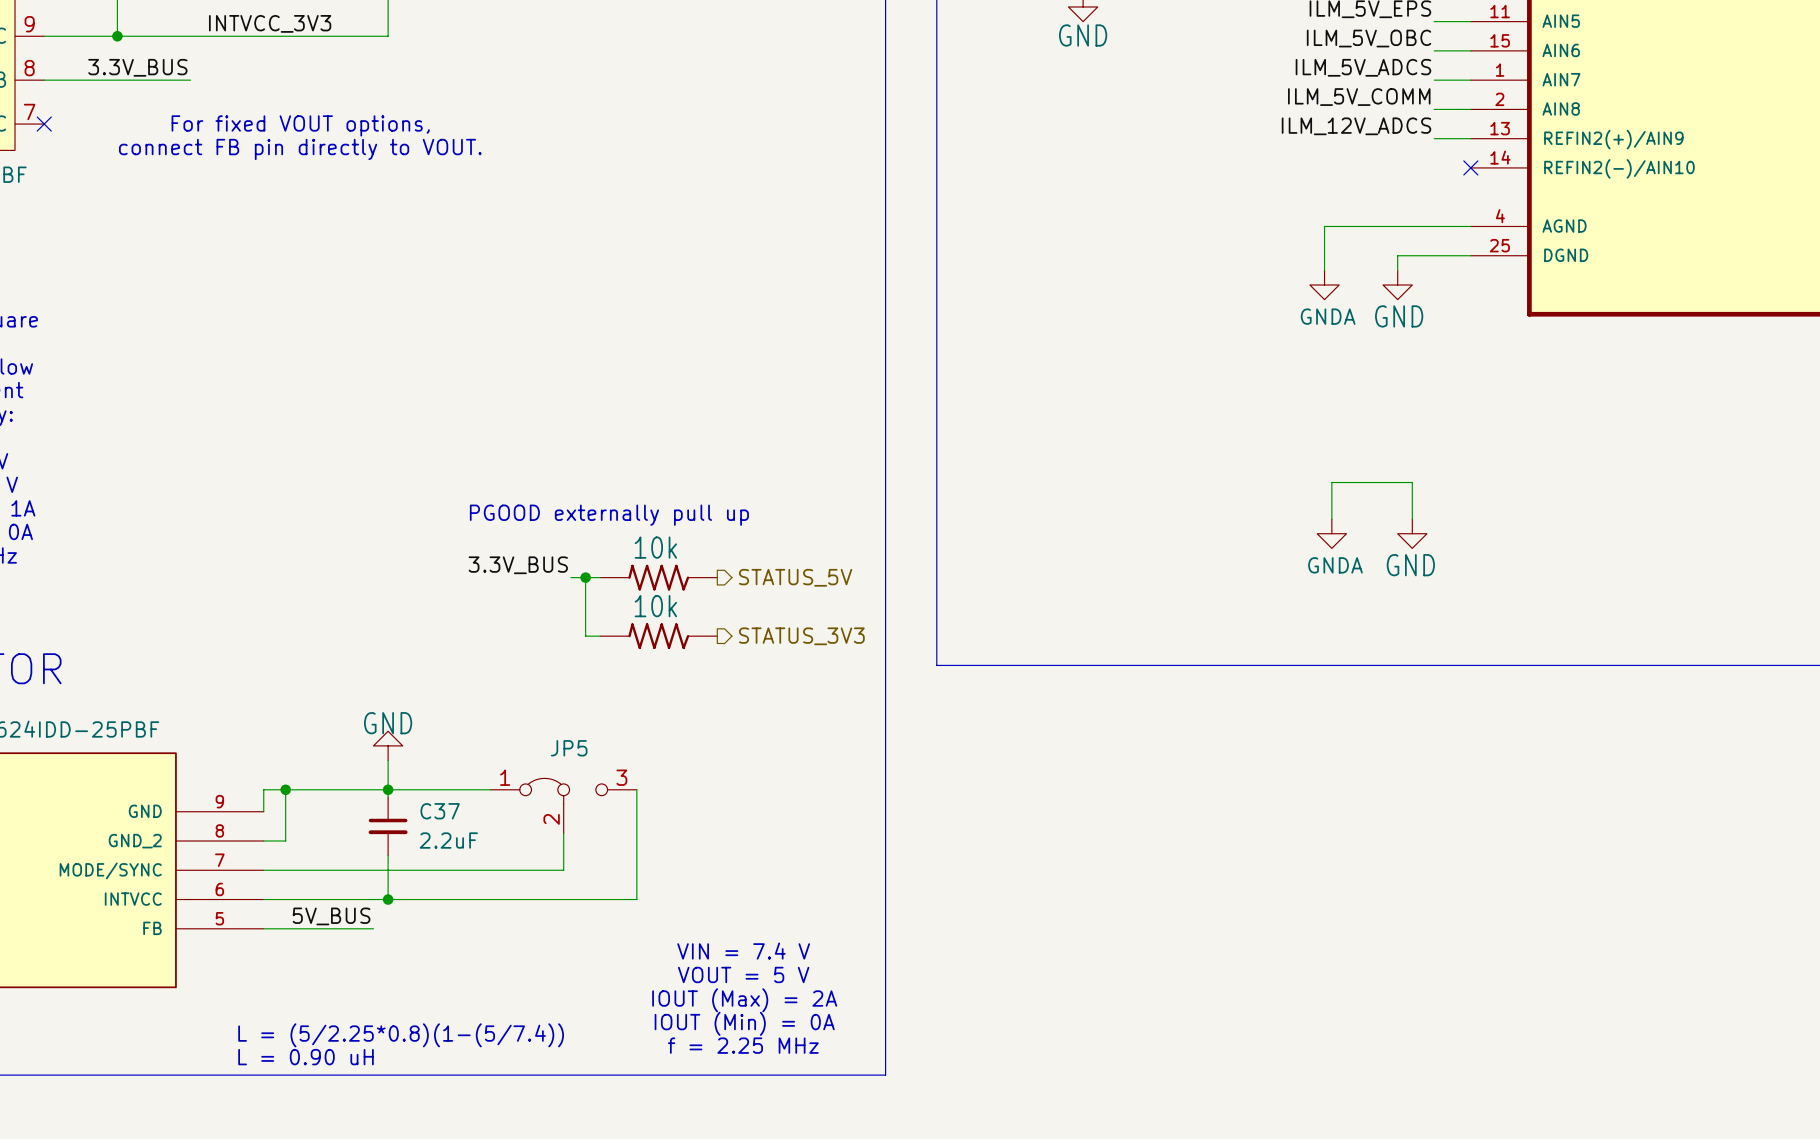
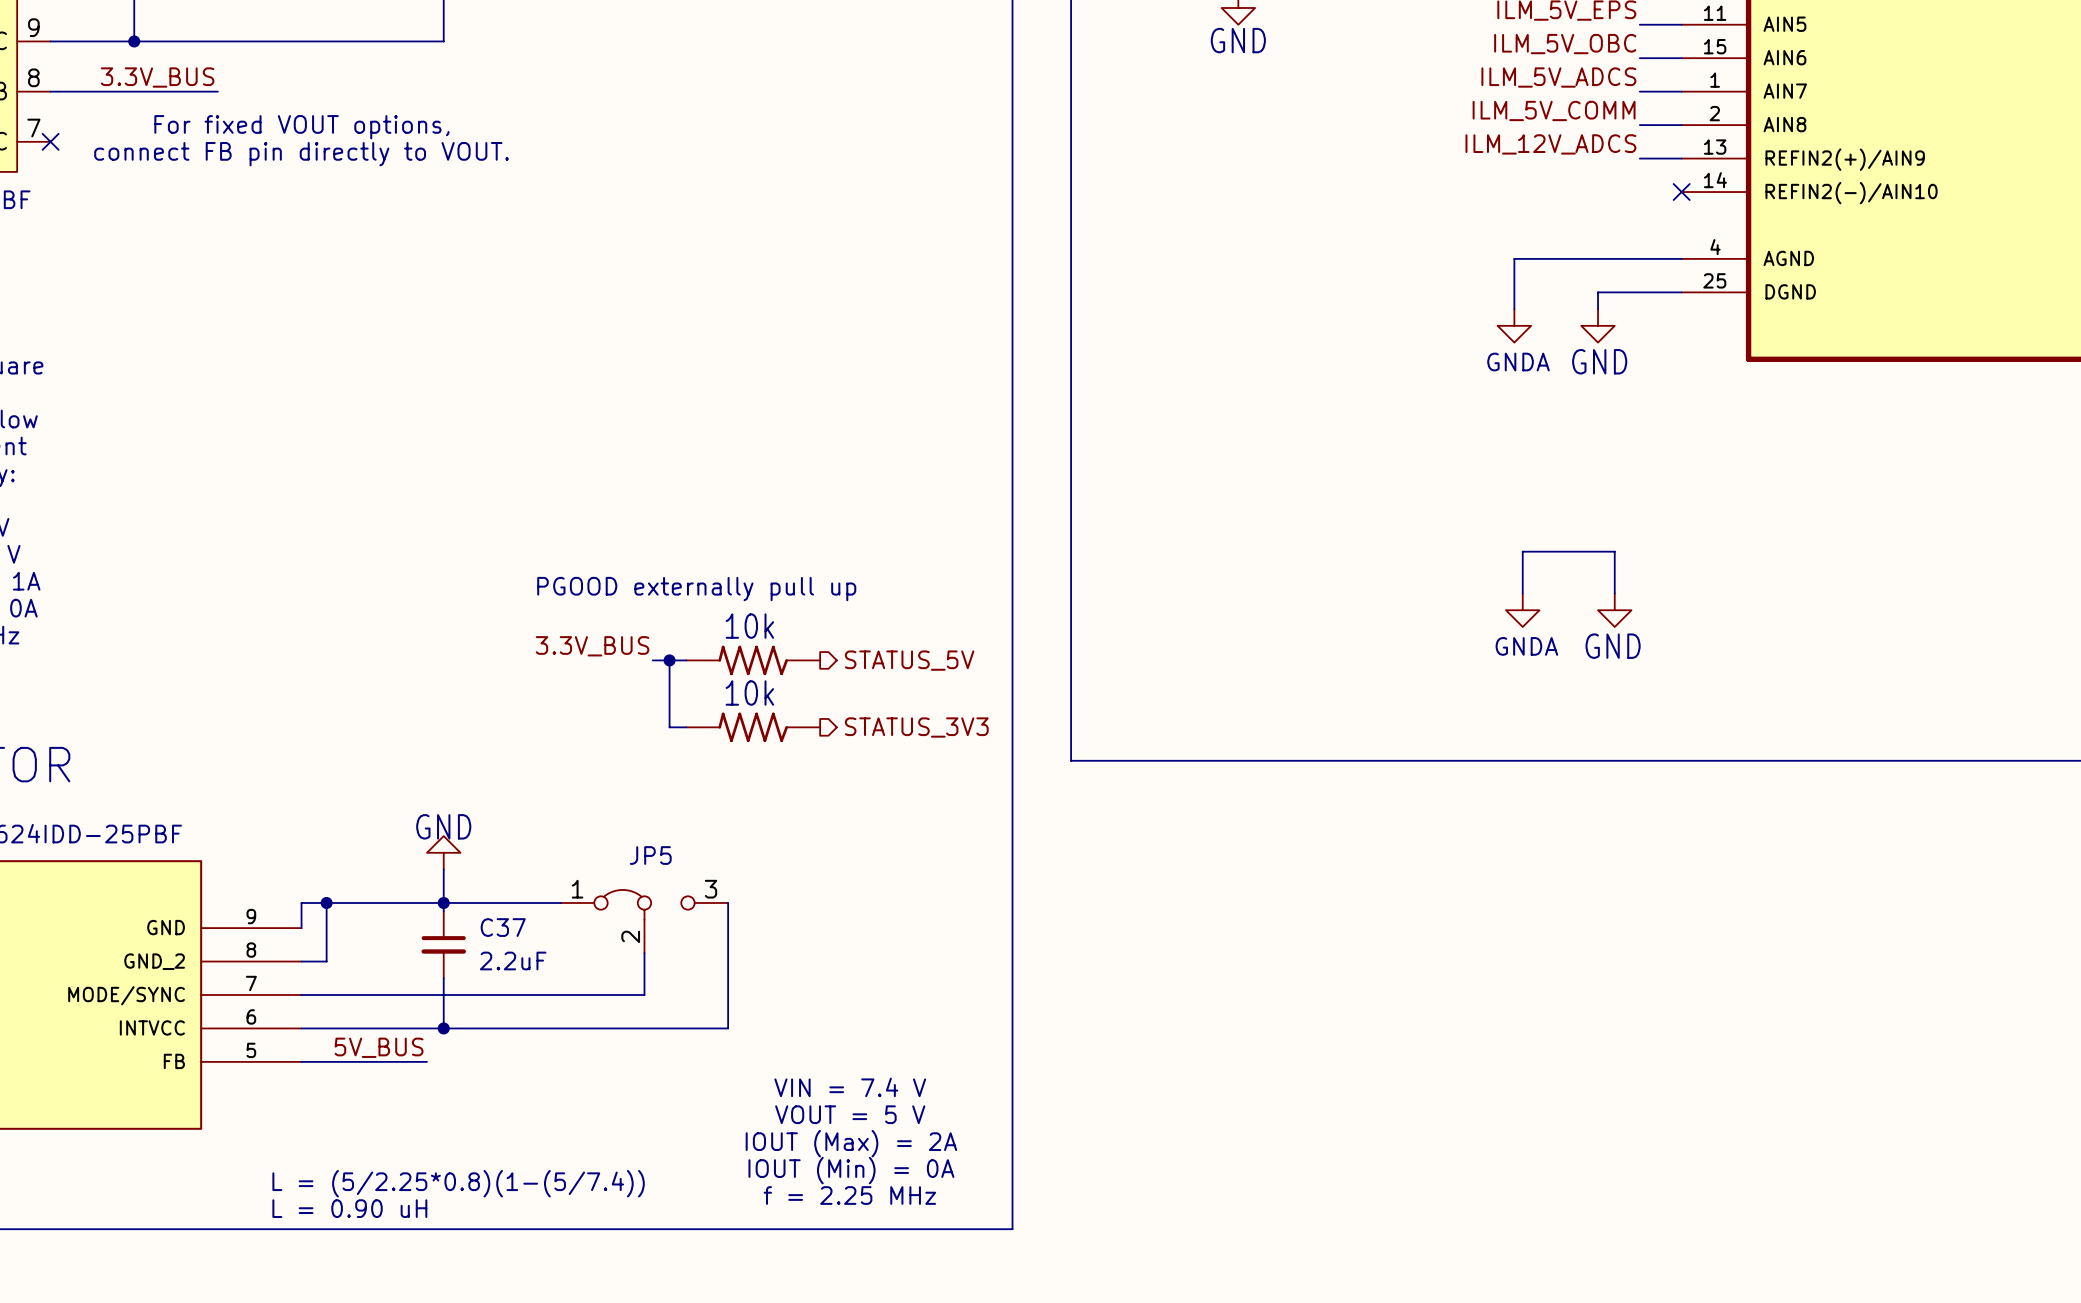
label: INTVCC_3V3 (270, 23) -> none
text position: For fixed VOUT options, (300, 125) -> For fixed VOUT options, (301, 127)
text position: connect FB pin directly to VOUT. (300, 149) -> connect FB pin directly to VOUT. (301, 154)

